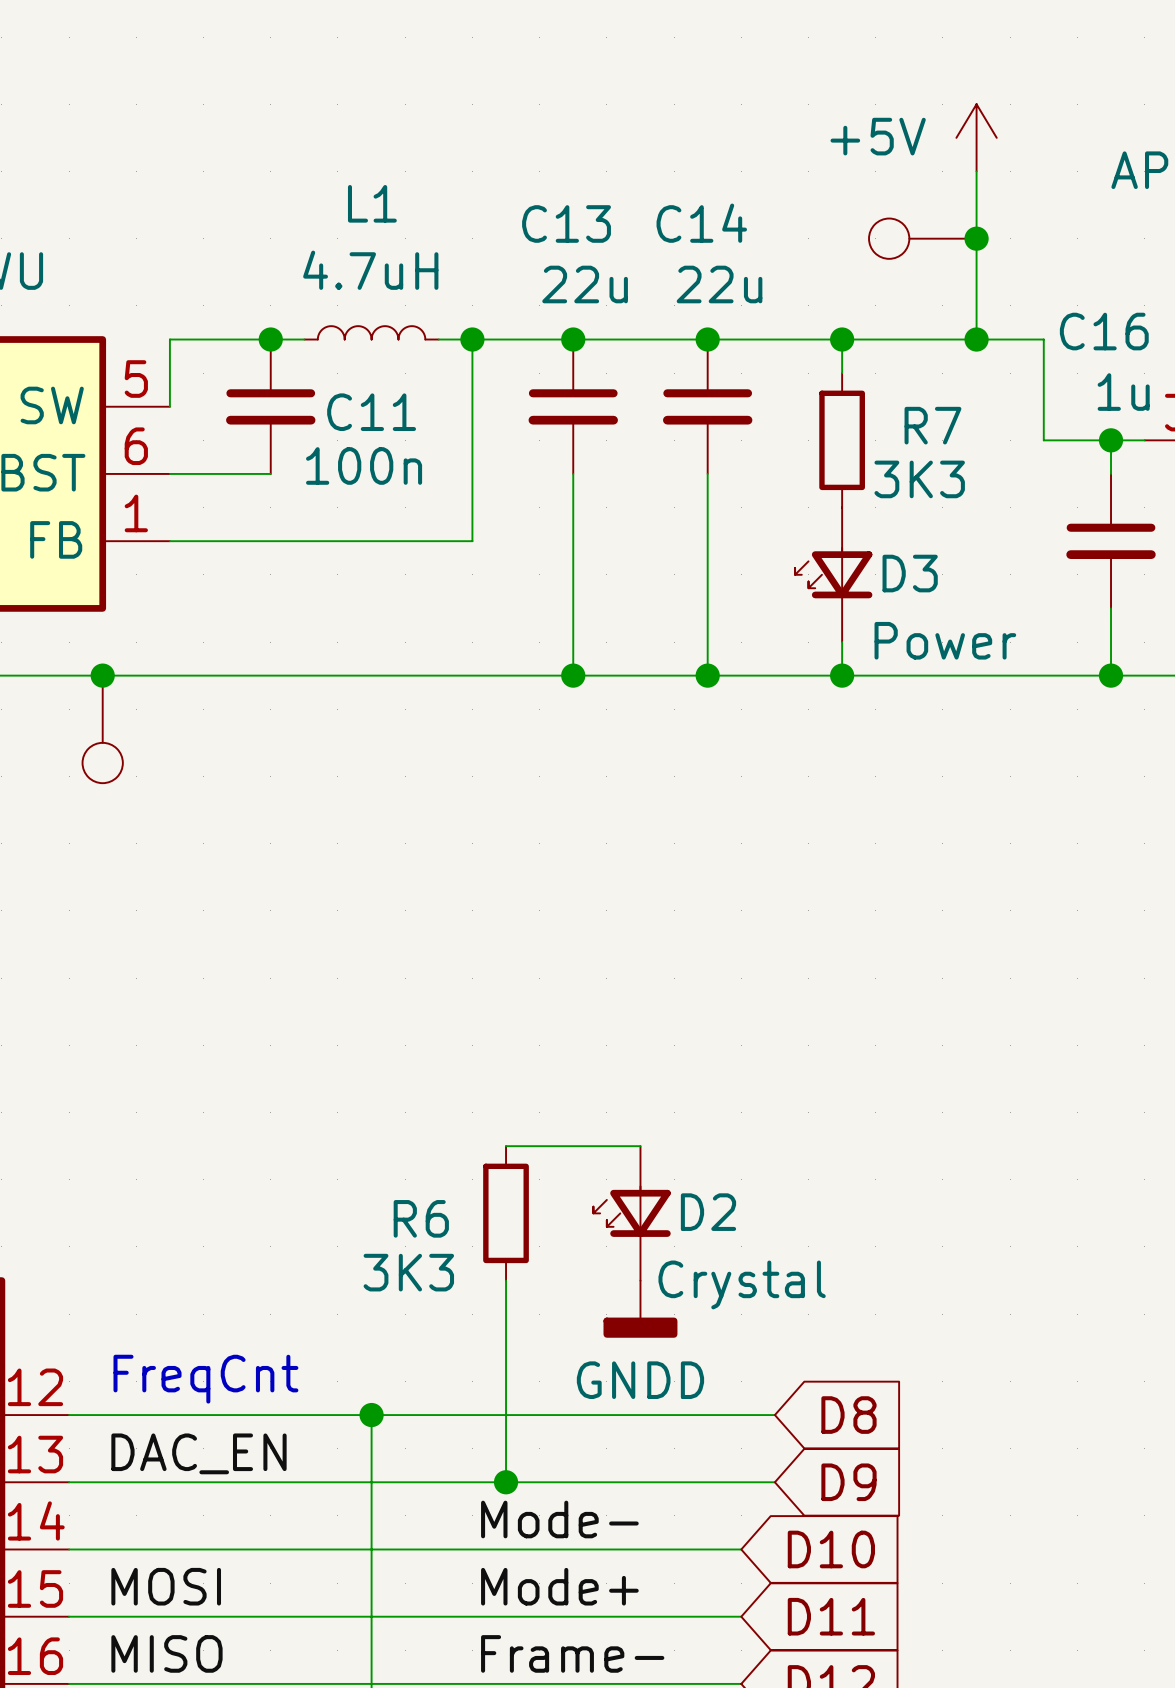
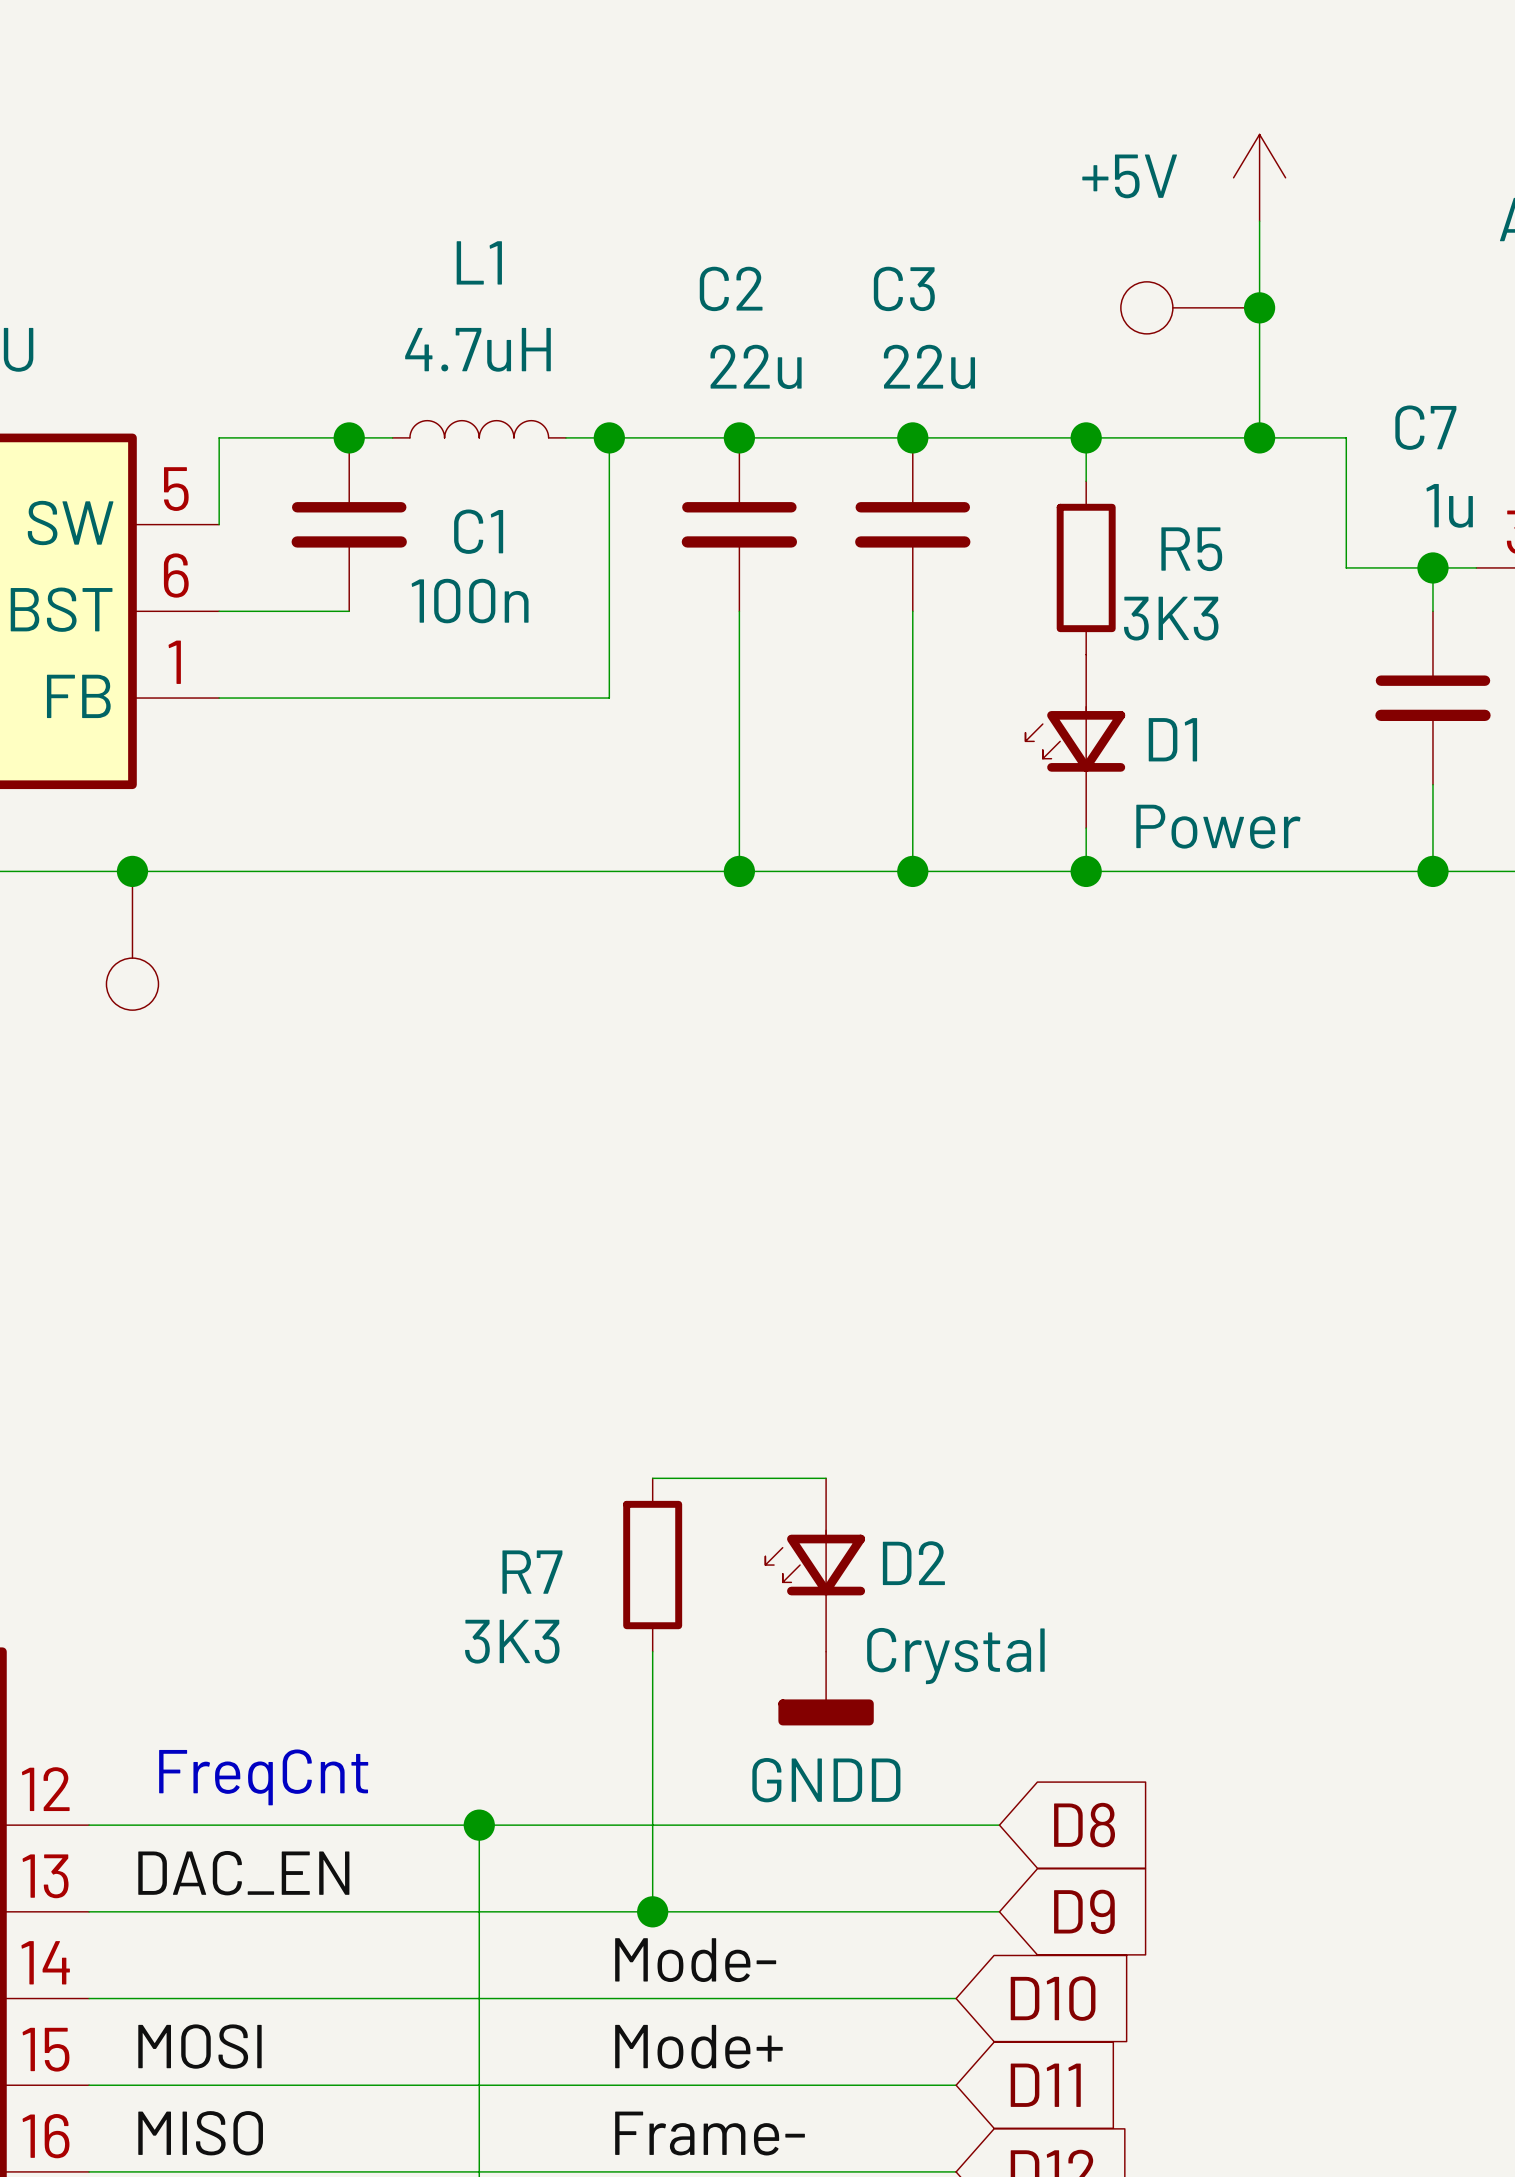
C13 name: C13 (566, 223) -> C2 (731, 288)
C14 name: C14 (701, 223) -> C3 (904, 288)
C16 name: C16 (1104, 331) -> C7 (1425, 427)
C11 name: C11 (371, 412) -> C1 (478, 531)
R7 name: R7 (932, 425) -> R5 (1191, 549)
D3 name: D3 (910, 573) -> D1 (1172, 739)
R6 name: R6 (421, 1218) -> R7 (532, 1572)

